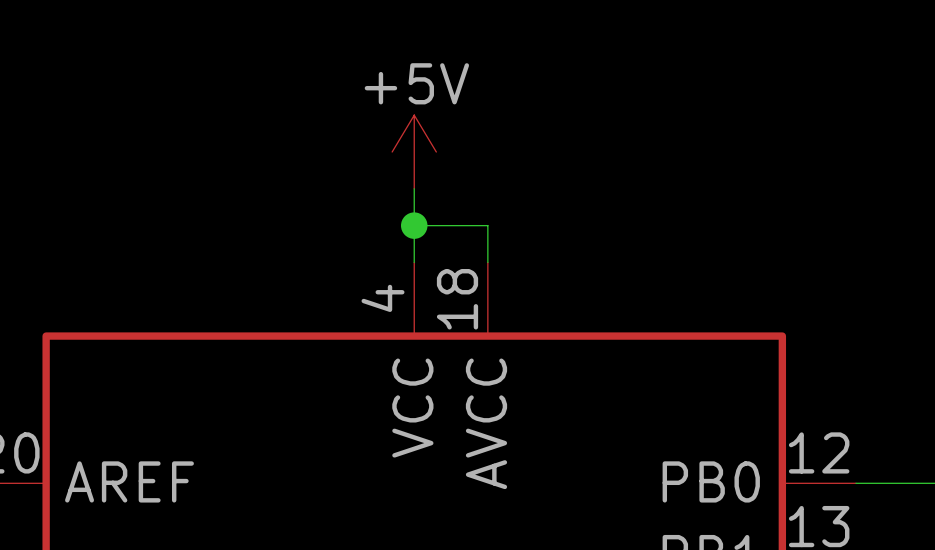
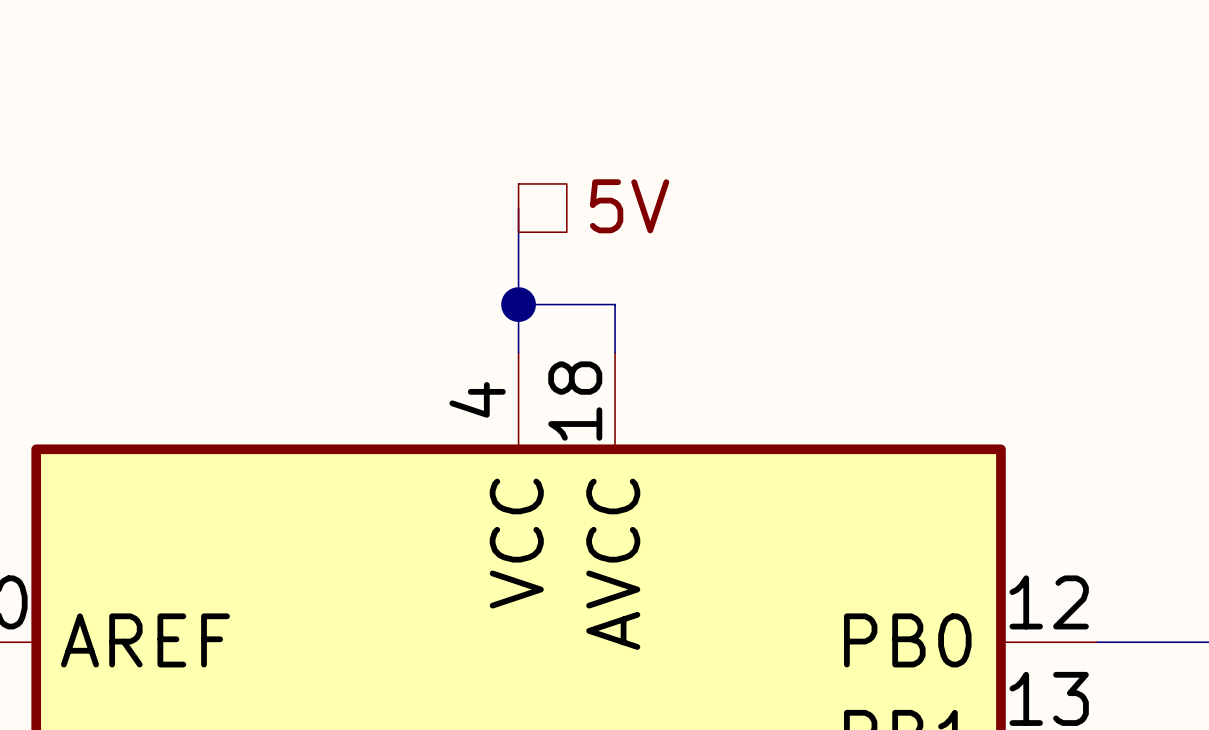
hierarchical label: none -> 5V (629, 206)
power symbol: +5V (414, 152) -> none

